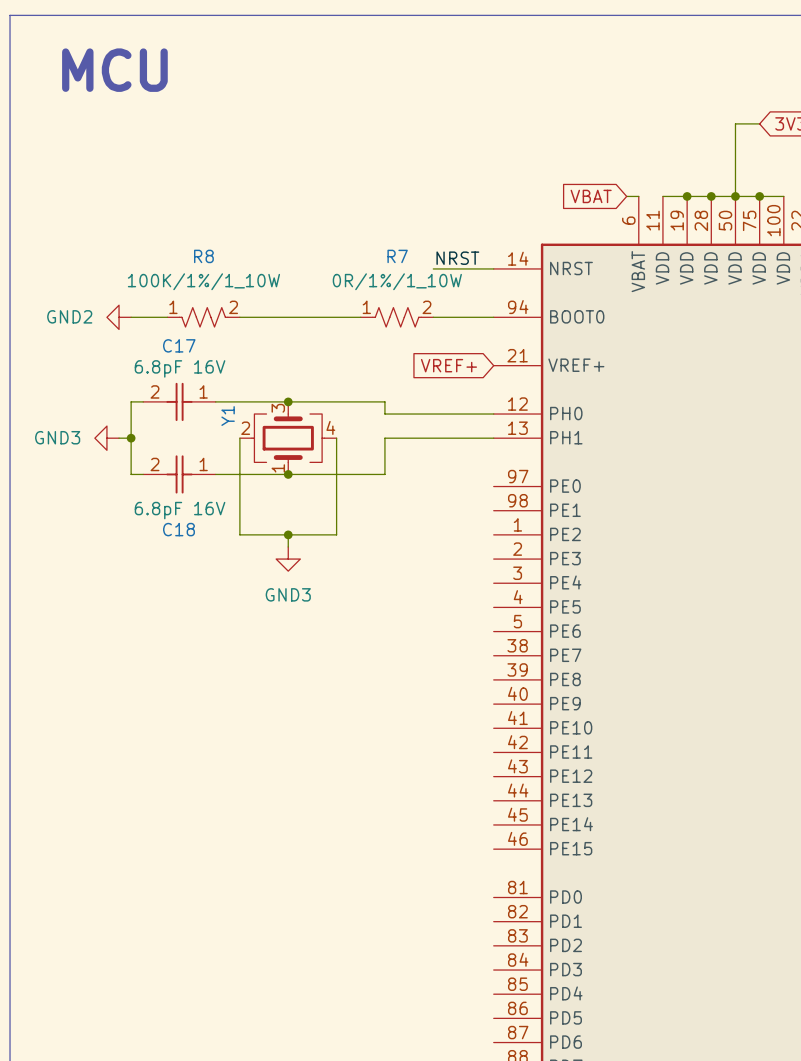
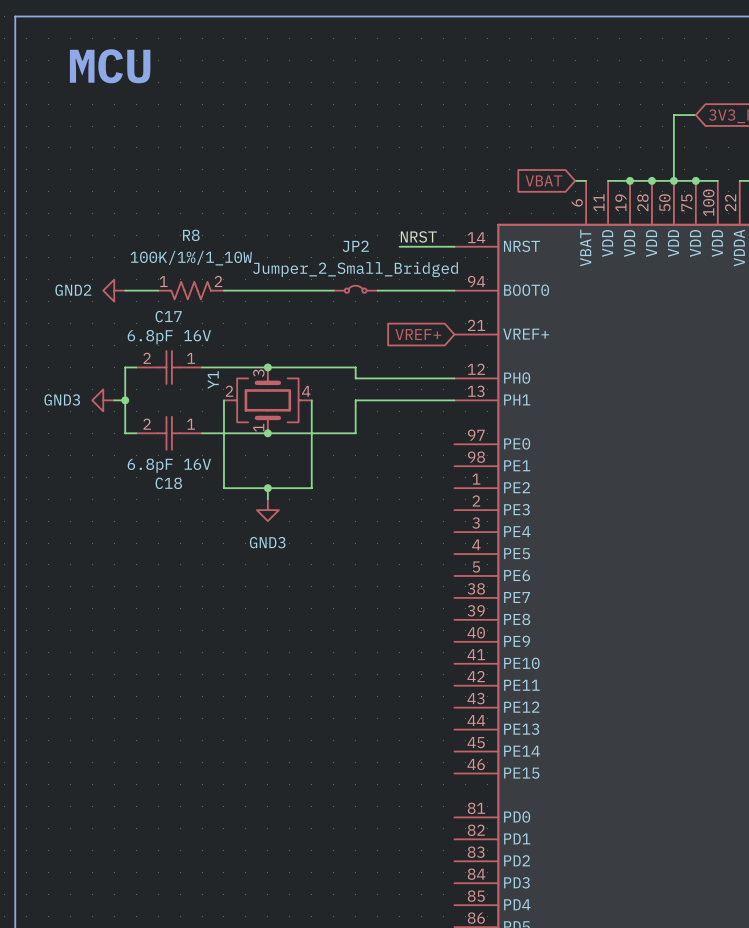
JP2: none -> Jumper_2_Small_Bridged (355, 289)
R7: 0R/1%/1_10W (397, 317) -> none

